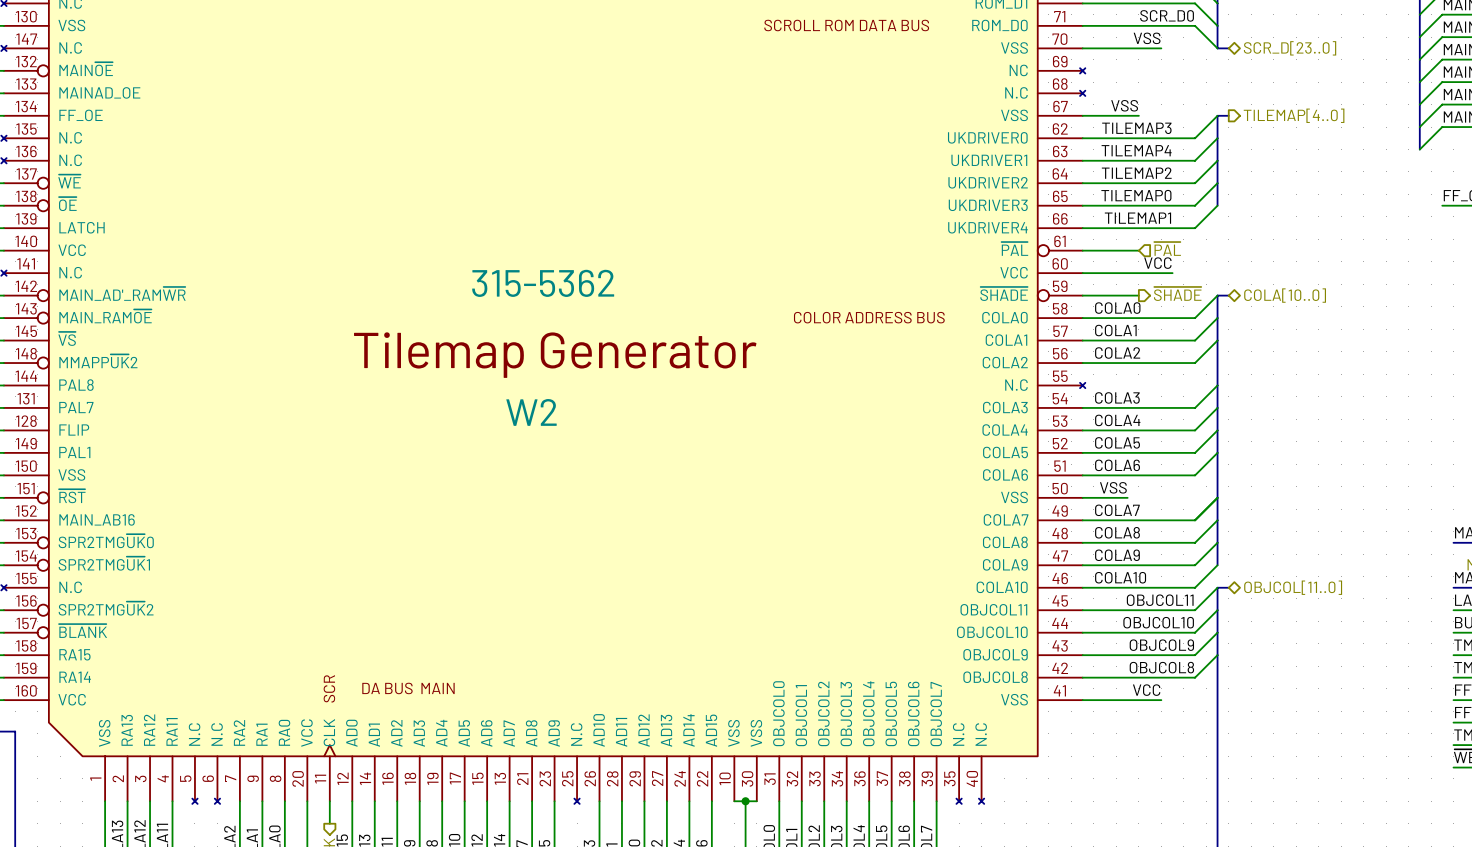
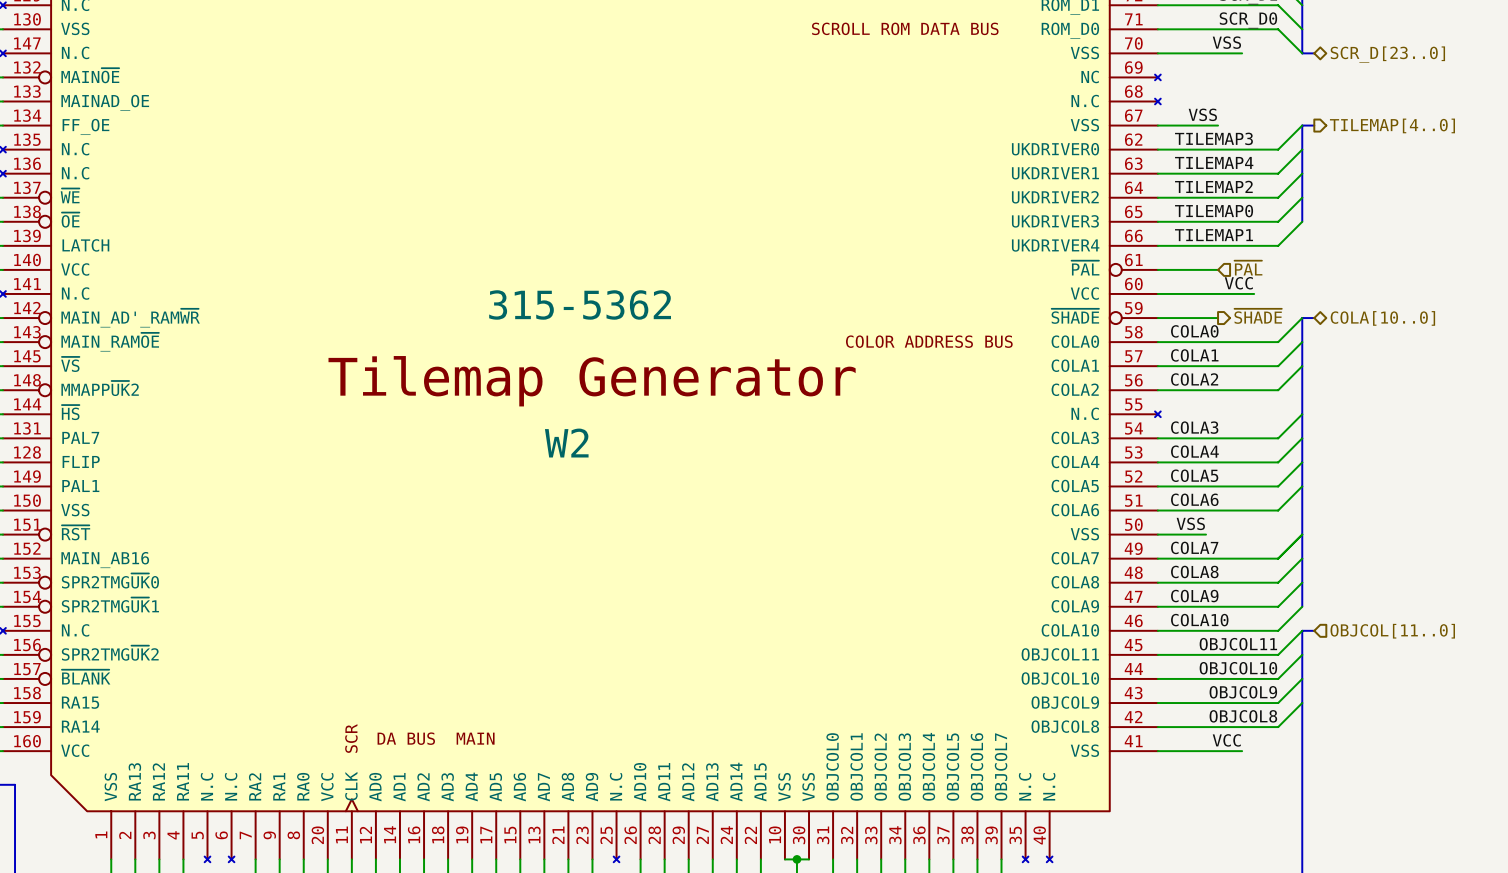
W2 pin name: PAL8 (76, 385) -> ~{HS} (70, 412)
hierarchical label shape: bidirectional (1293, 587) -> input (1392, 631)

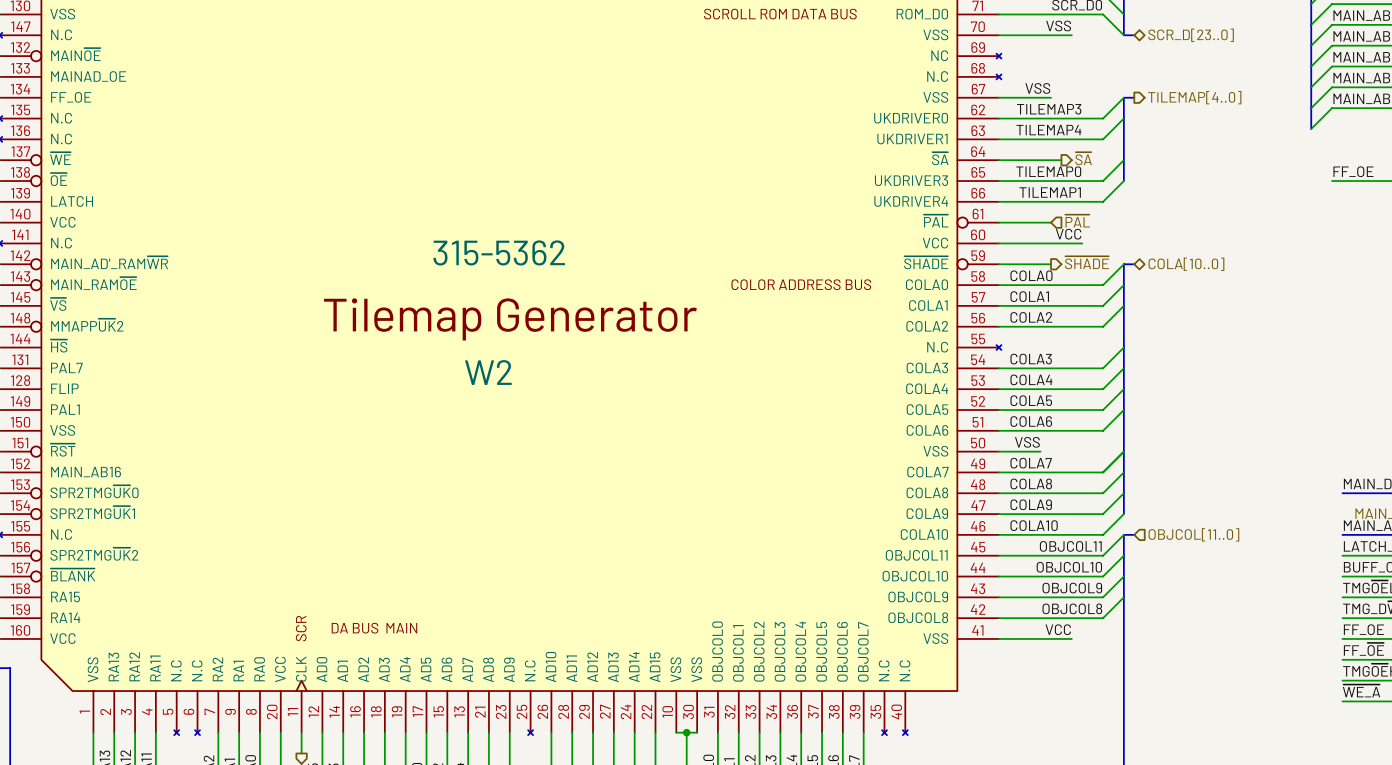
wire: (1302, 173) (1278, 197) (1230, 197) -> none
label: TILEMAP2 (1213, 186) -> none
hierarchical label: none -> ~{SA} (1083, 158)
W2 pin name: UKDRIVER2 (1055, 197) -> ~{SA} (940, 158)

